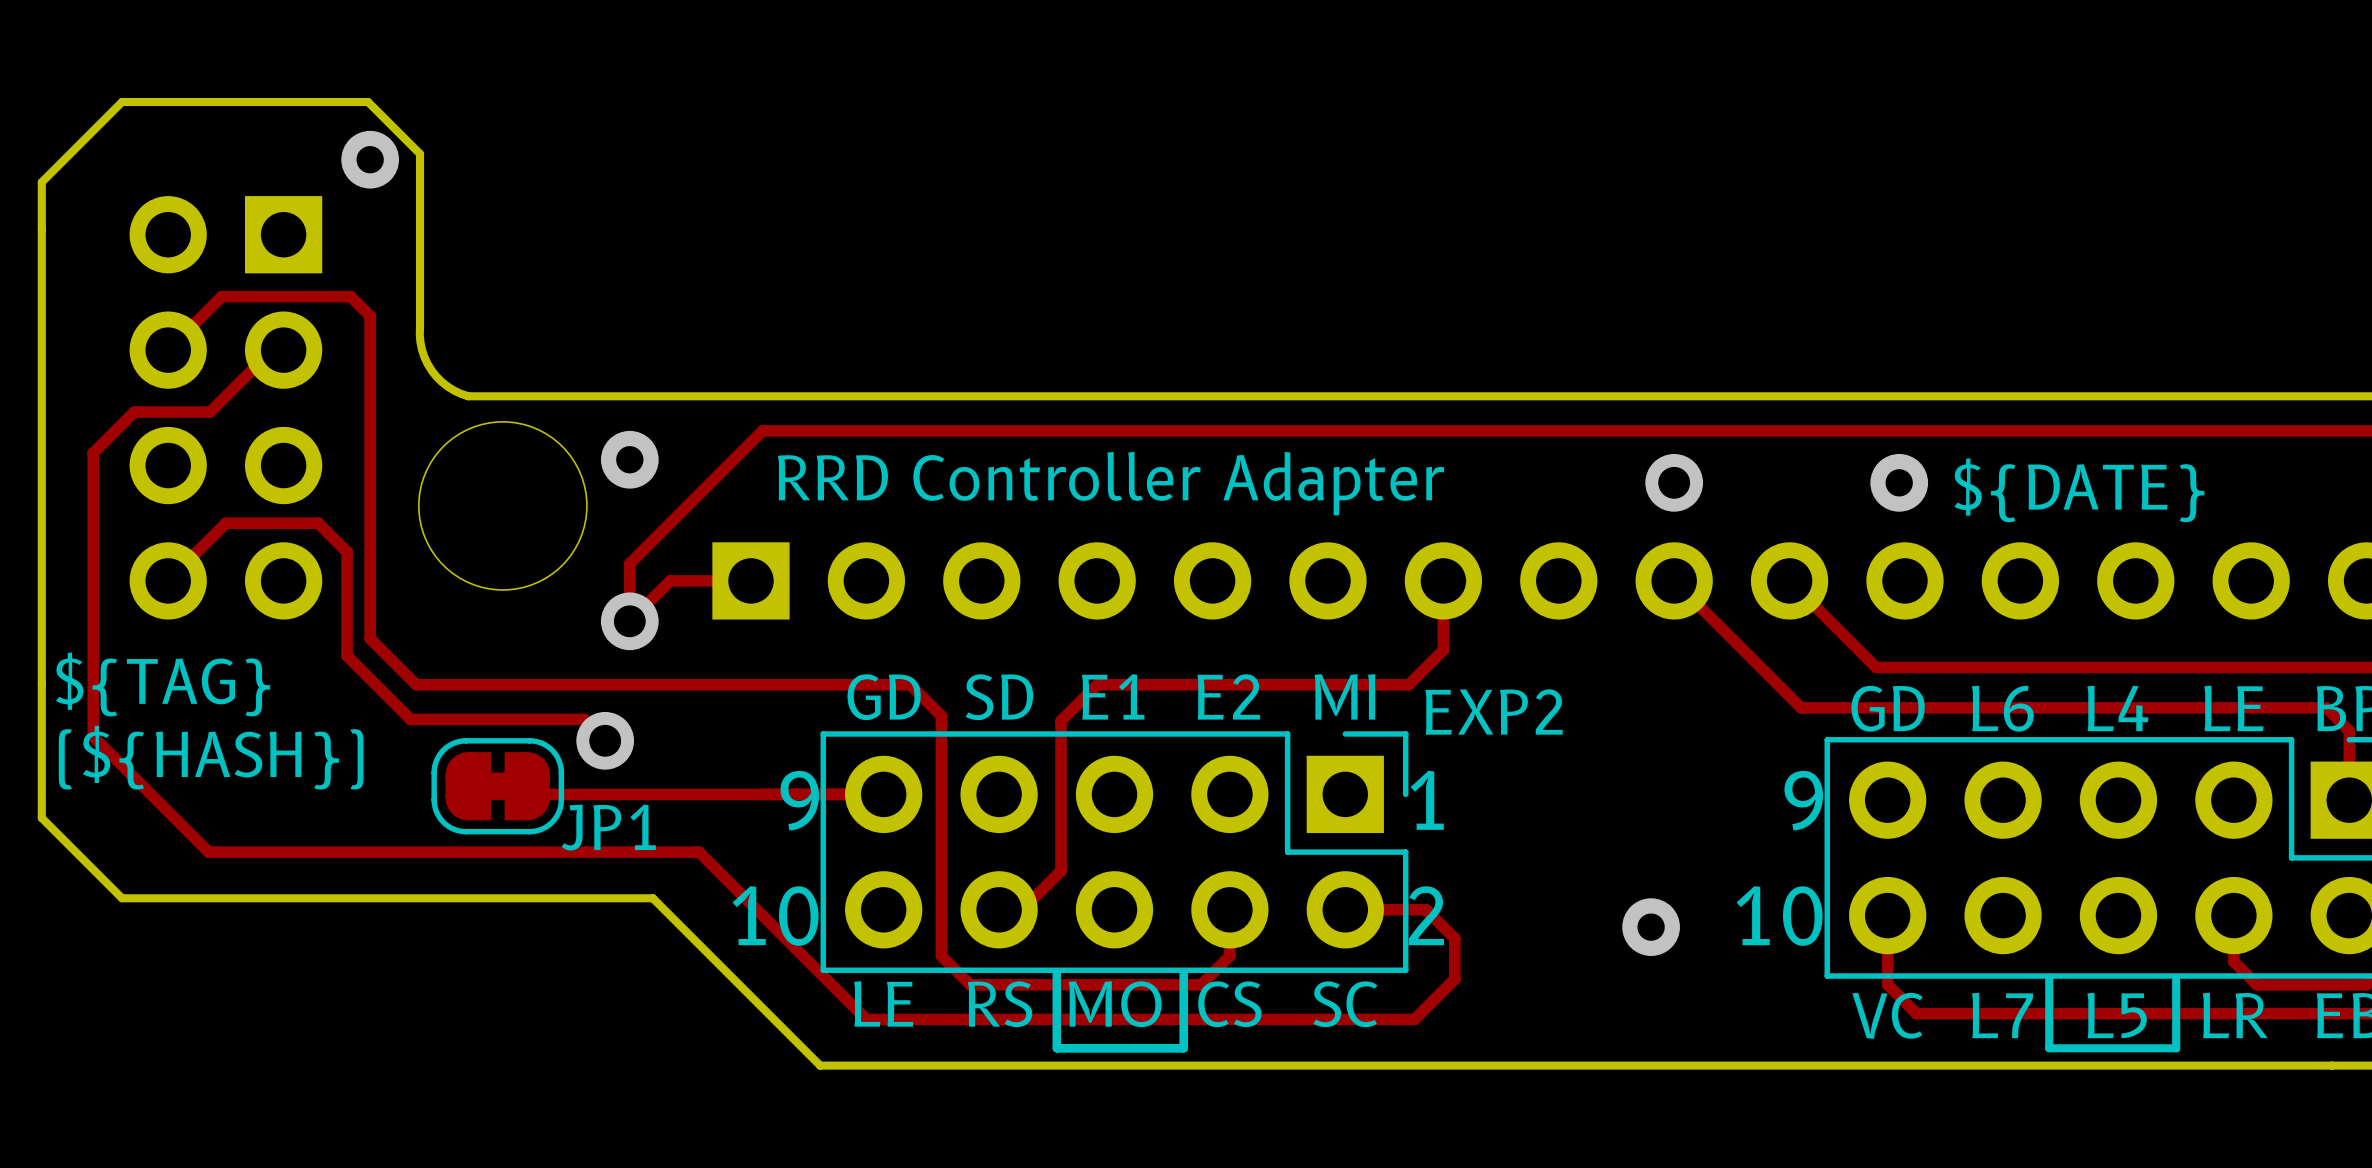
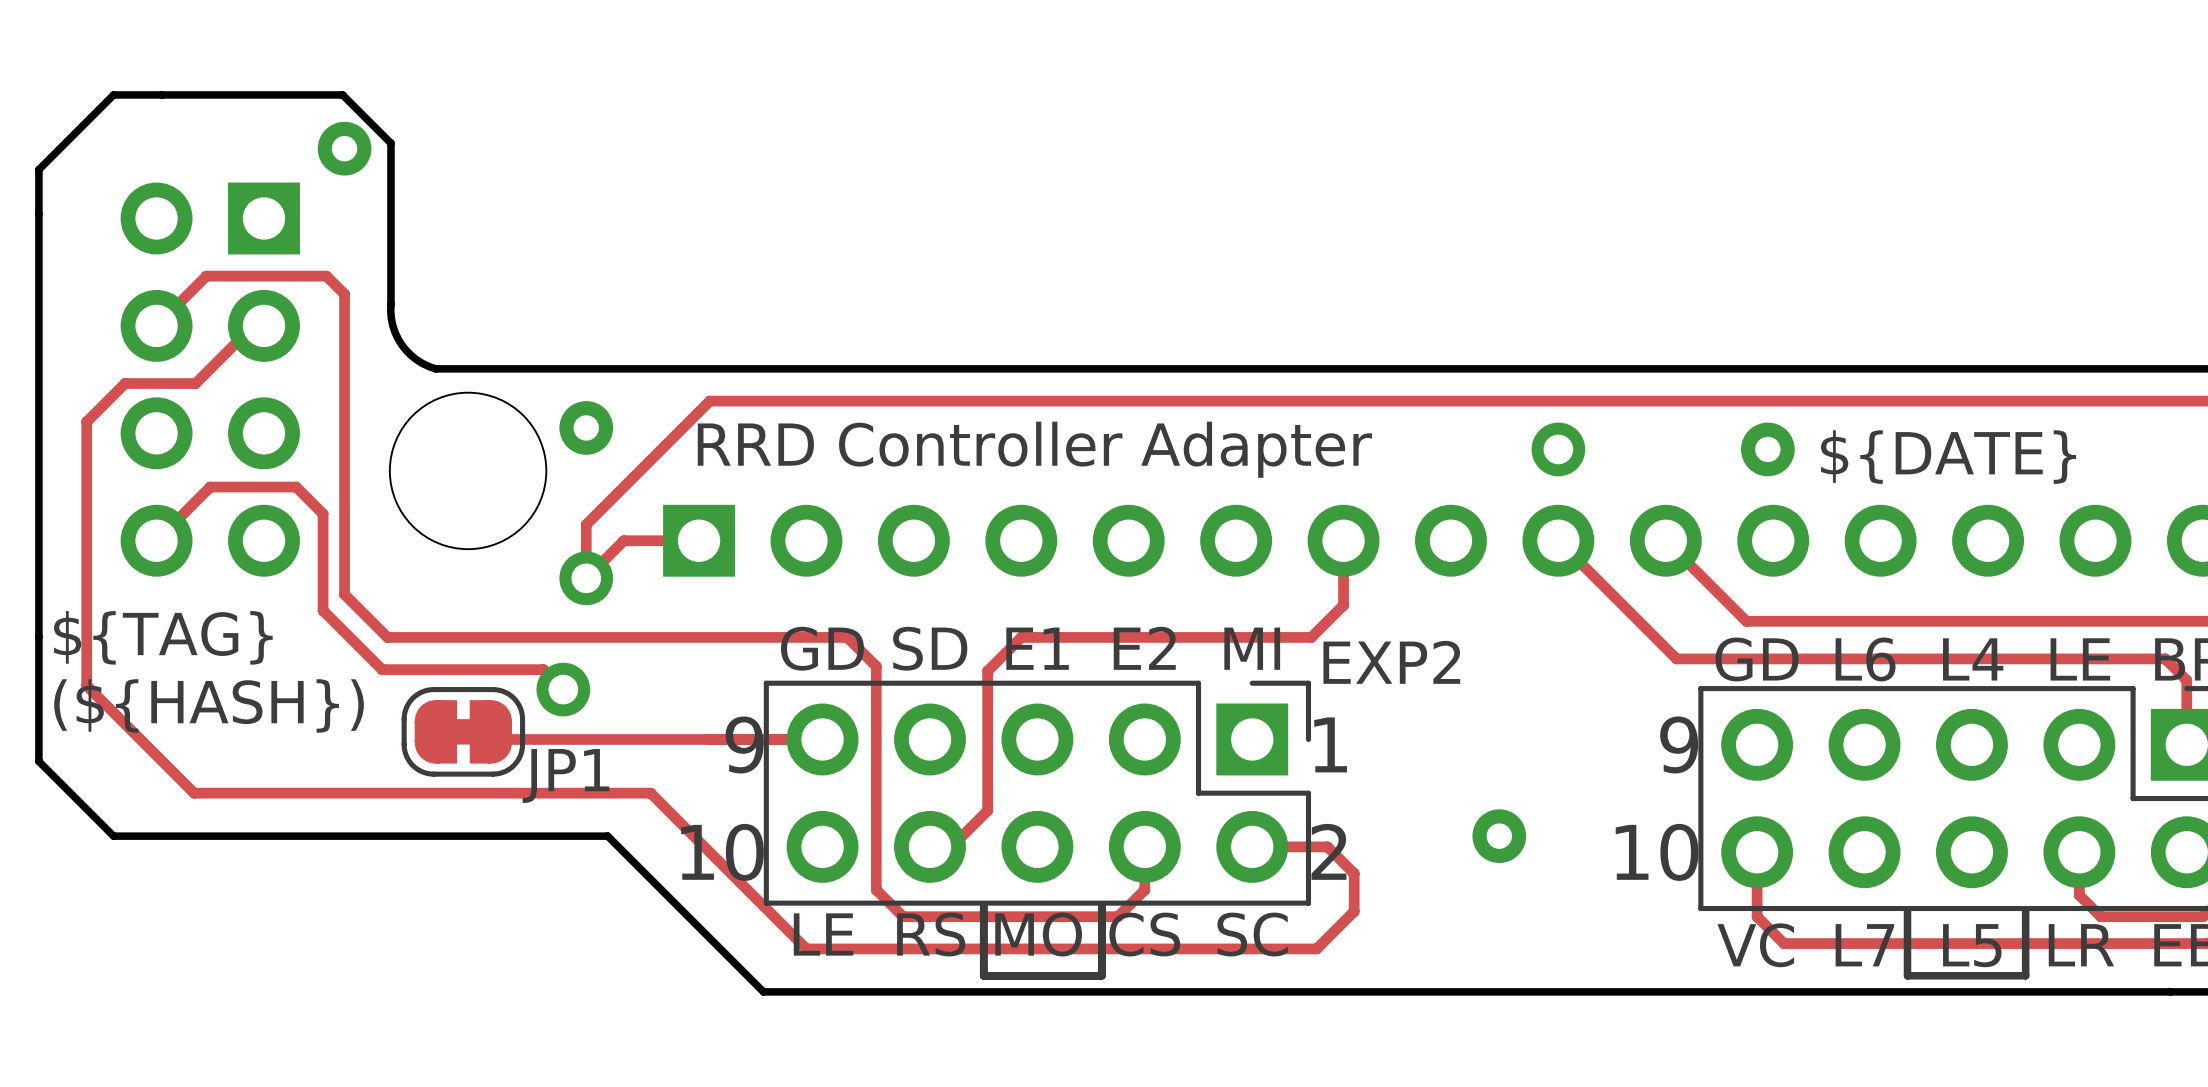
via position: (1651, 927) -> (1499, 836)

